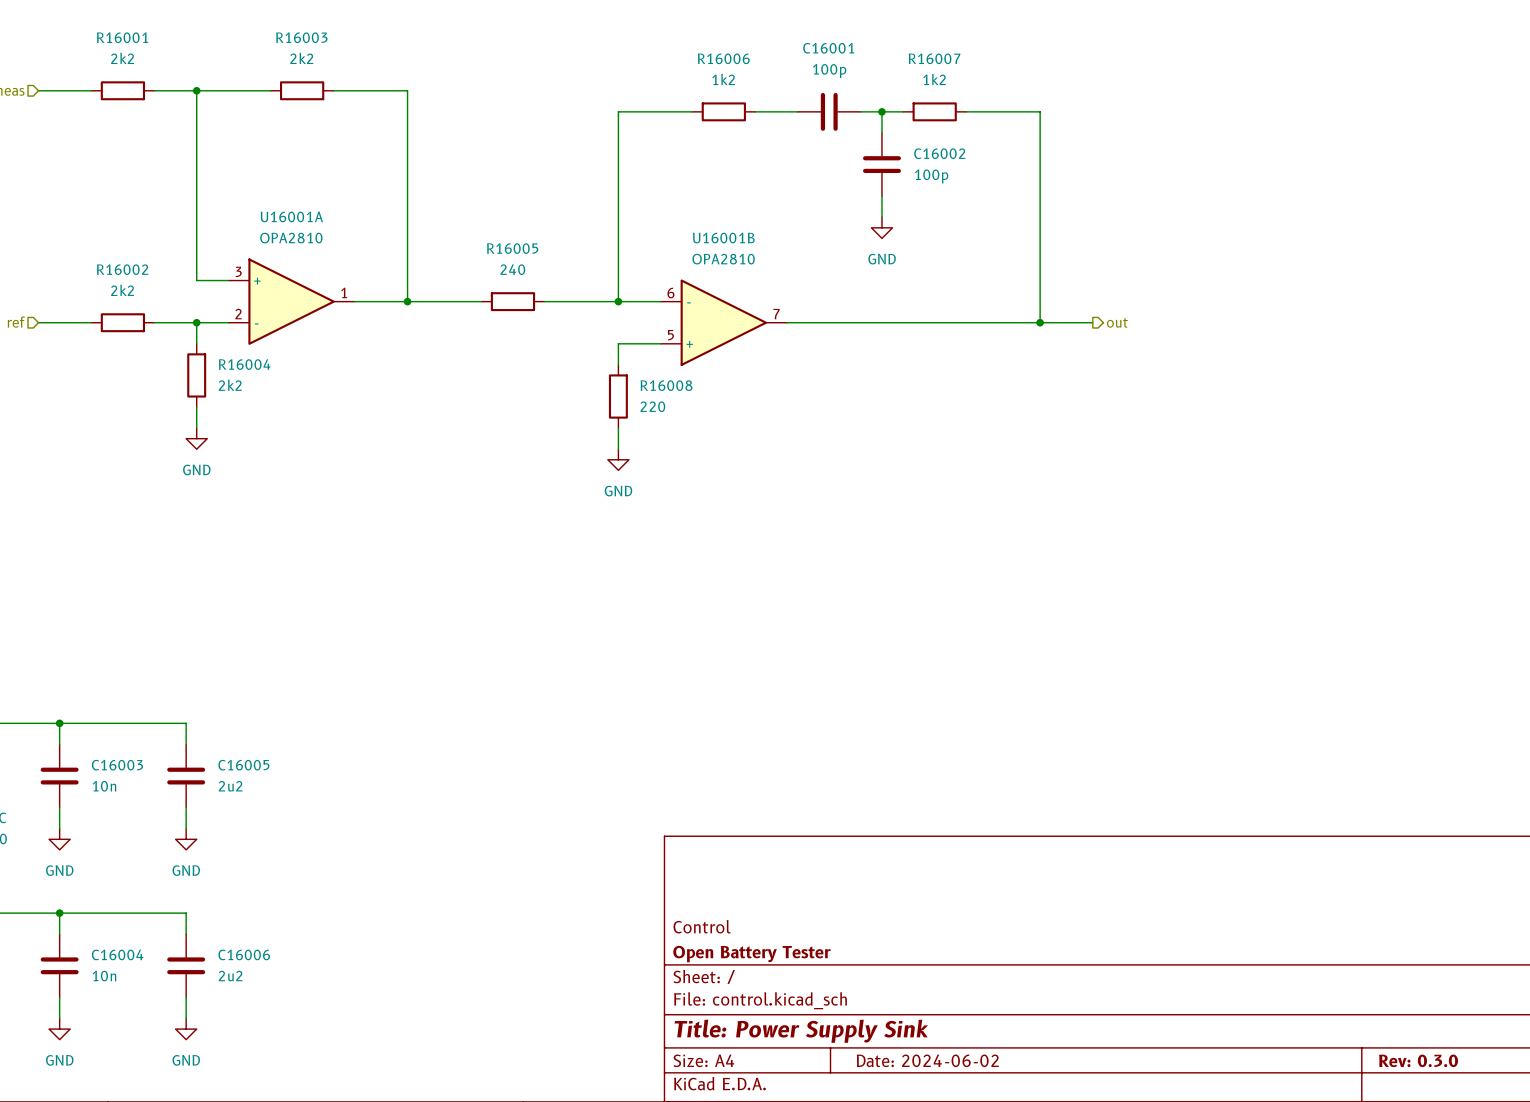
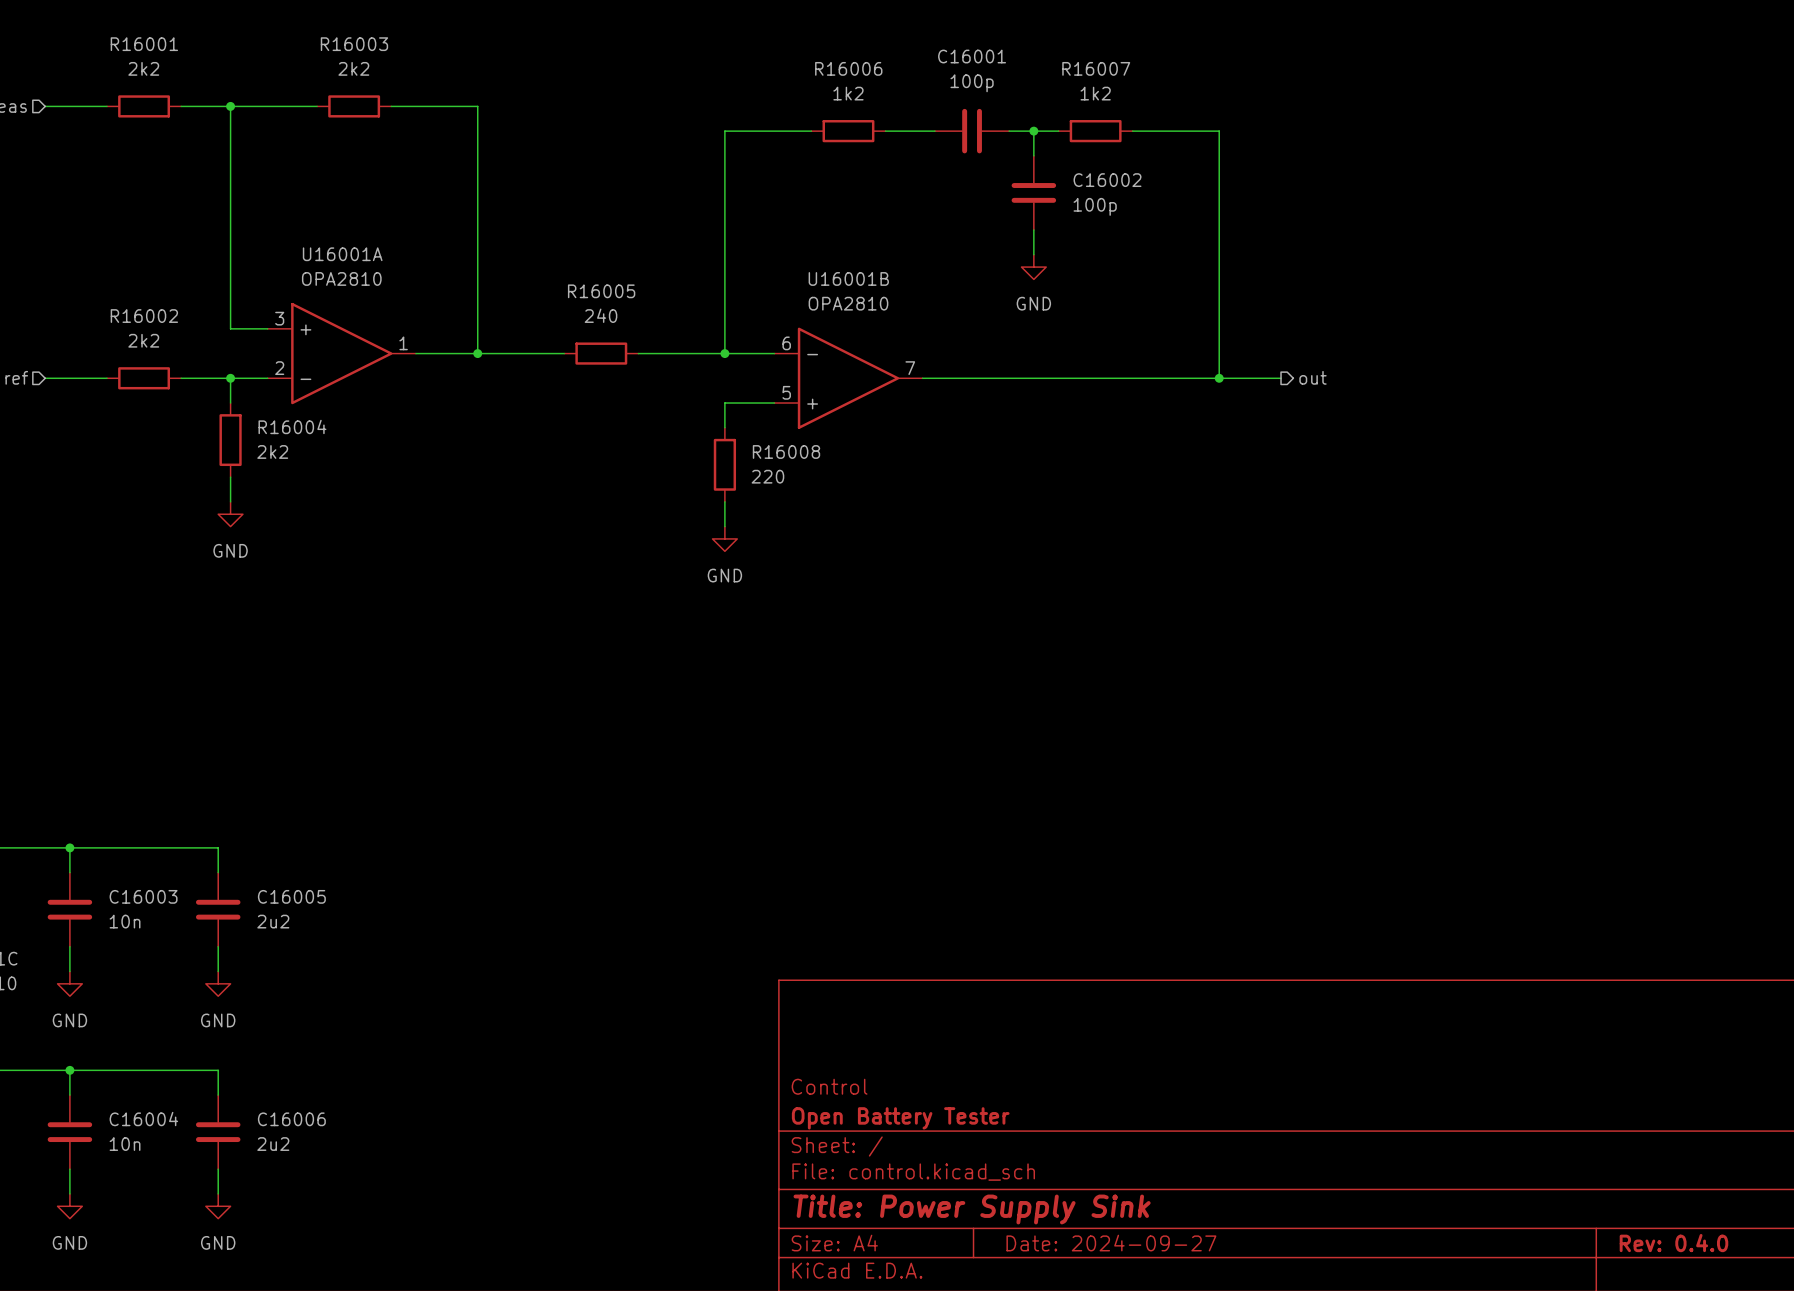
title block: Date: 2024-06-02 (927, 1060) -> Date: 2024-09-27 (1111, 1243)
title block: Rev: 0.3.0 (1418, 1060) -> Rev: 0.4.0 (1673, 1243)

